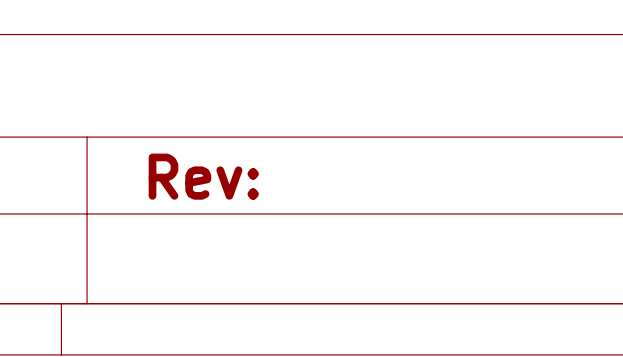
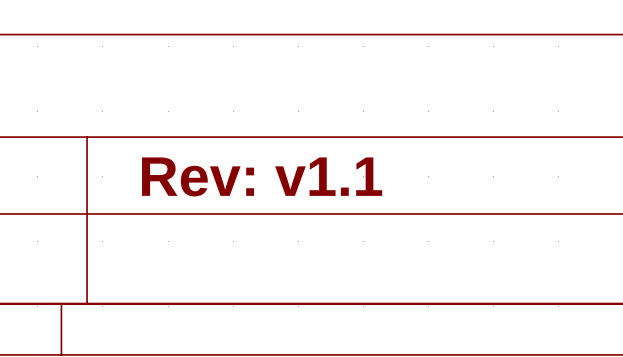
title block: Rev: (203, 176) -> Rev: v1.1 (262, 176)

